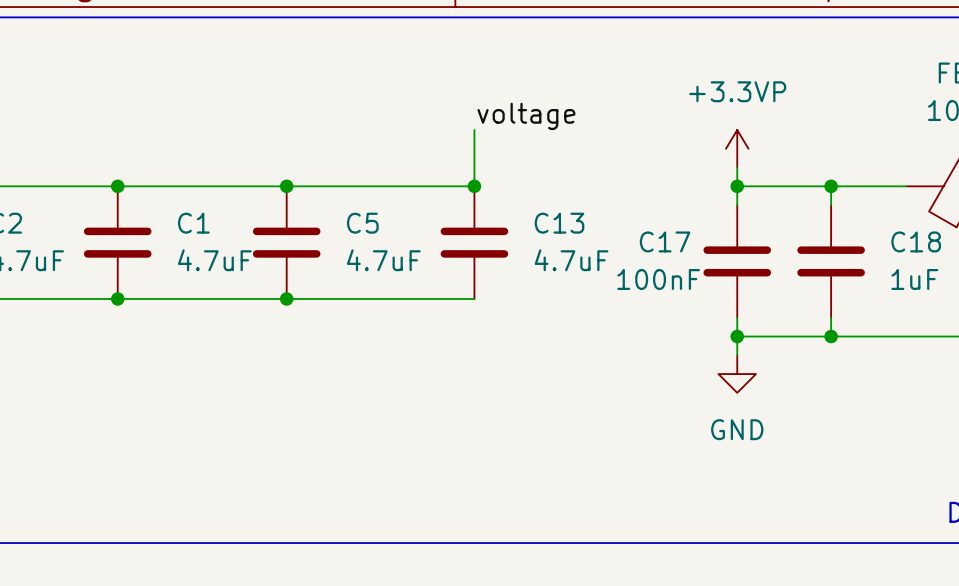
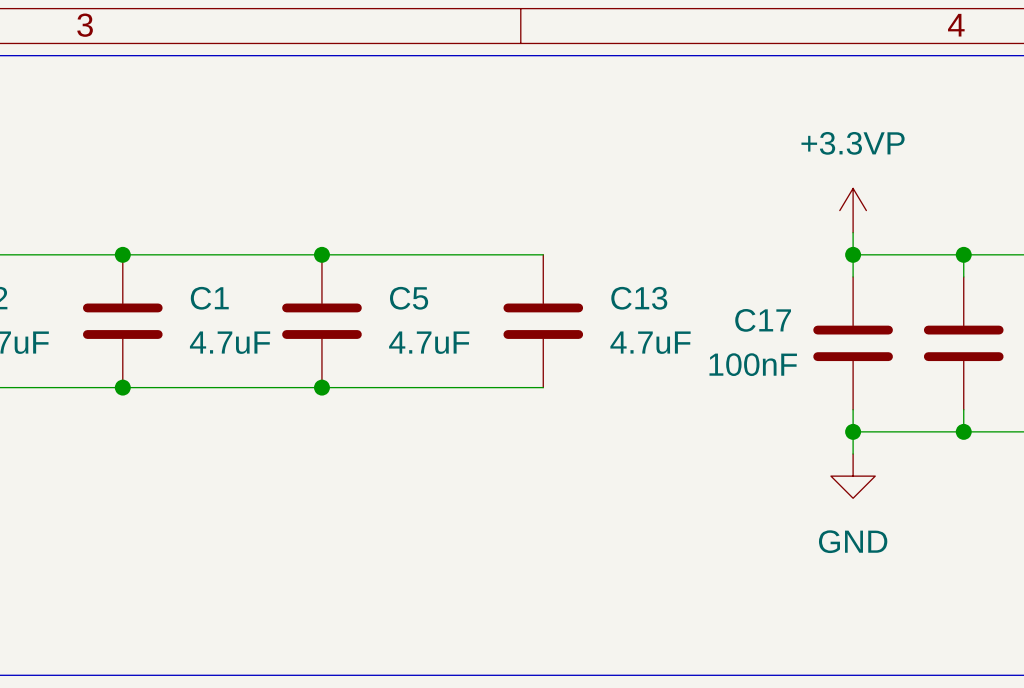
label: voltage (526, 116) -> none
wire: (474, 130) (474, 186) -> none
junction: (474, 186) -> none

